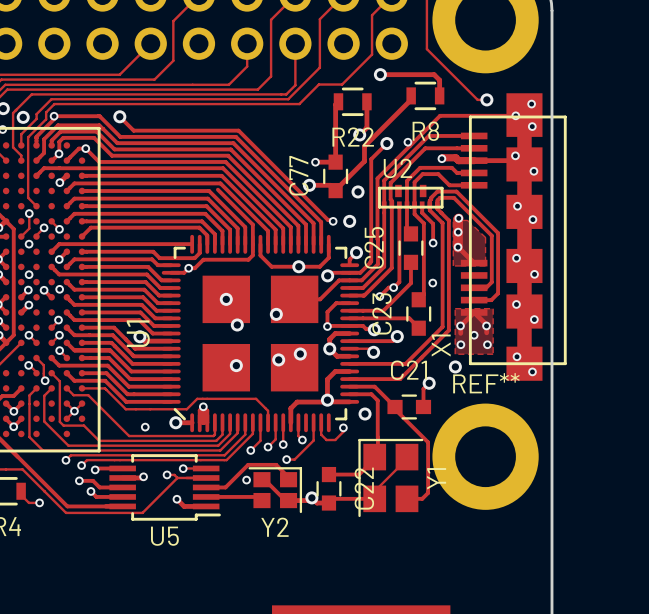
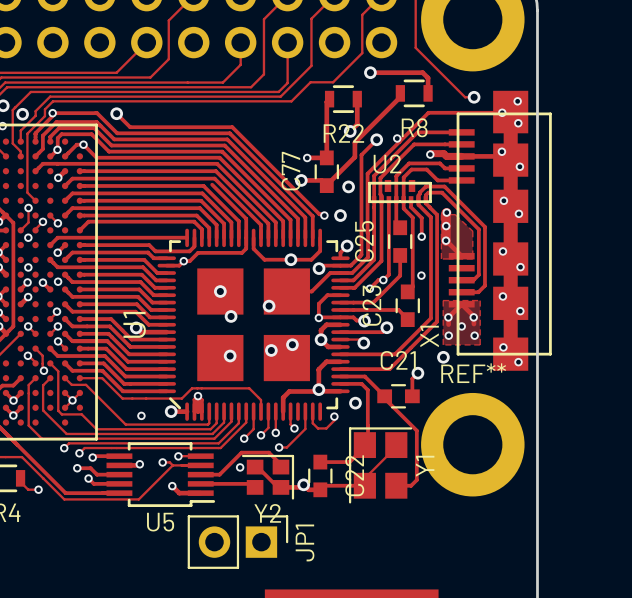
JP1: none -> (237, 542)

